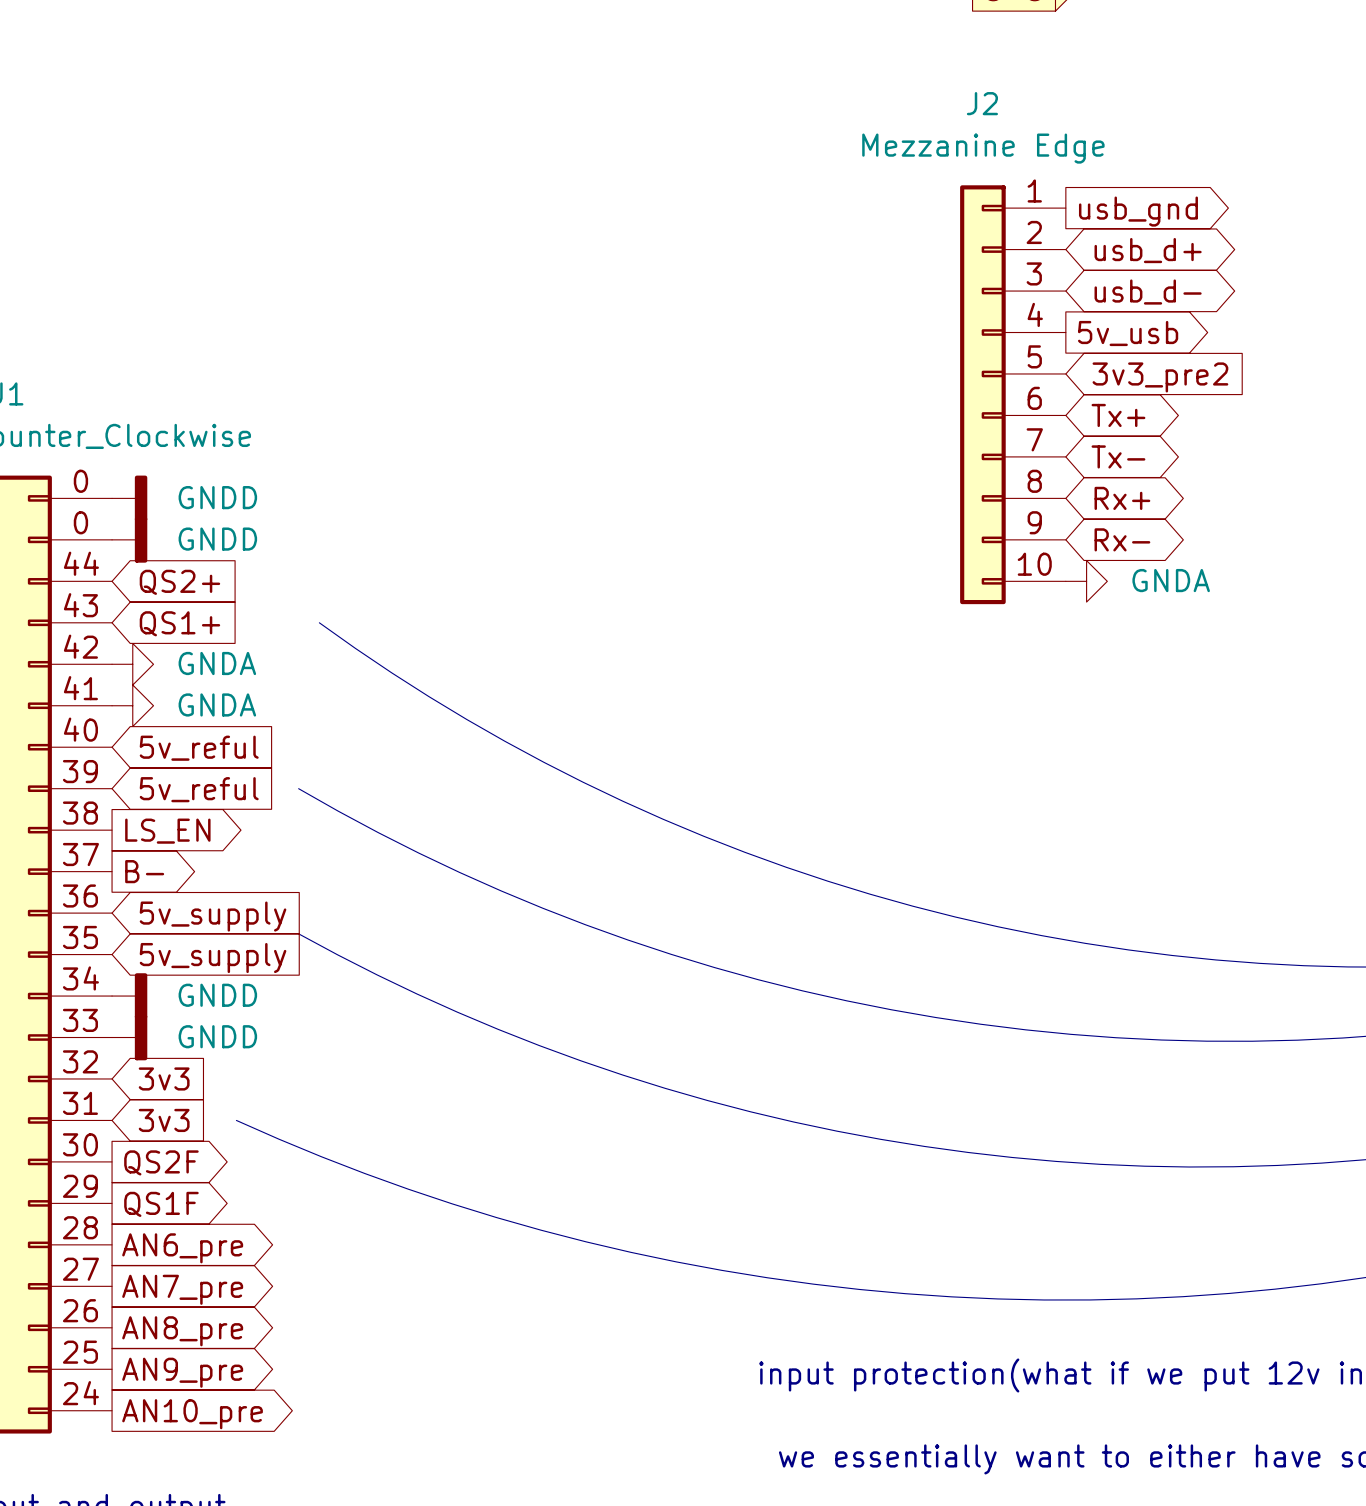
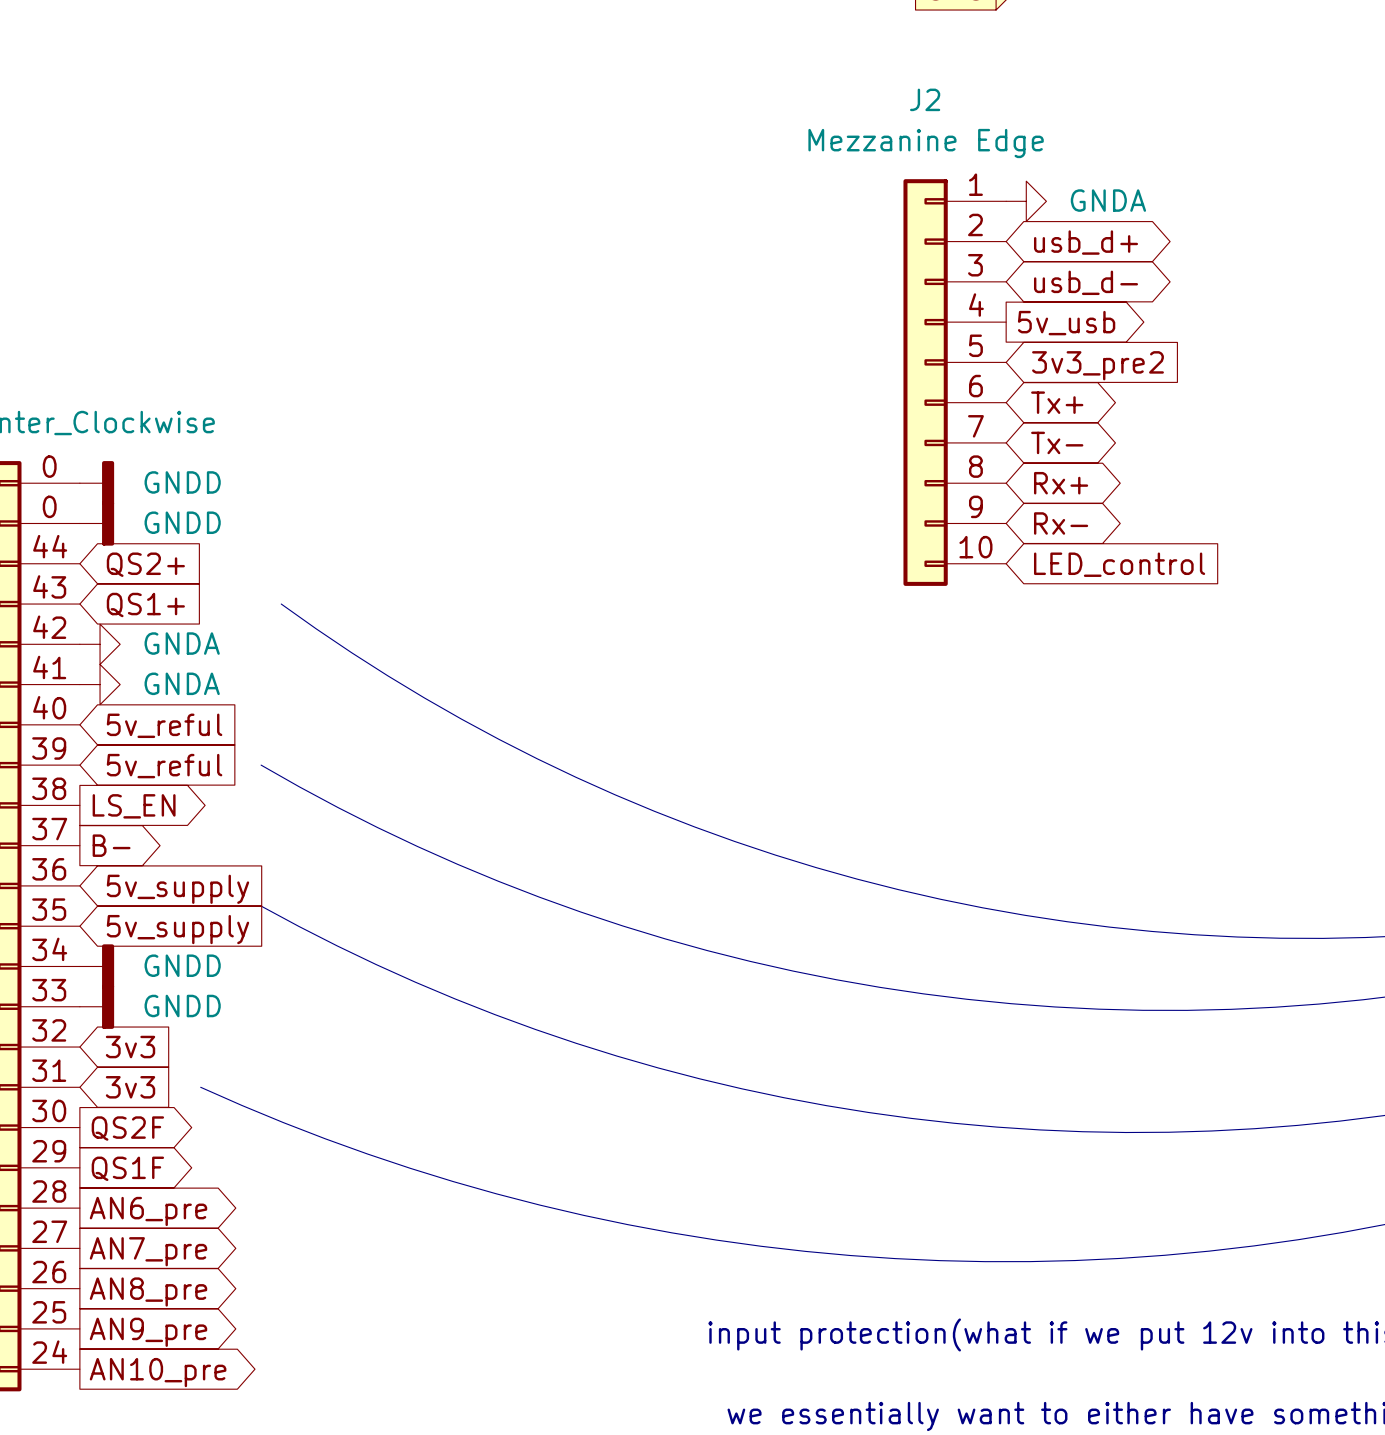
global label: usb_gnd (1138, 211) -> none
power symbol position: GNDA (1086, 581) -> GNDA (1026, 201)
global label: none -> LED_control (1119, 564)

